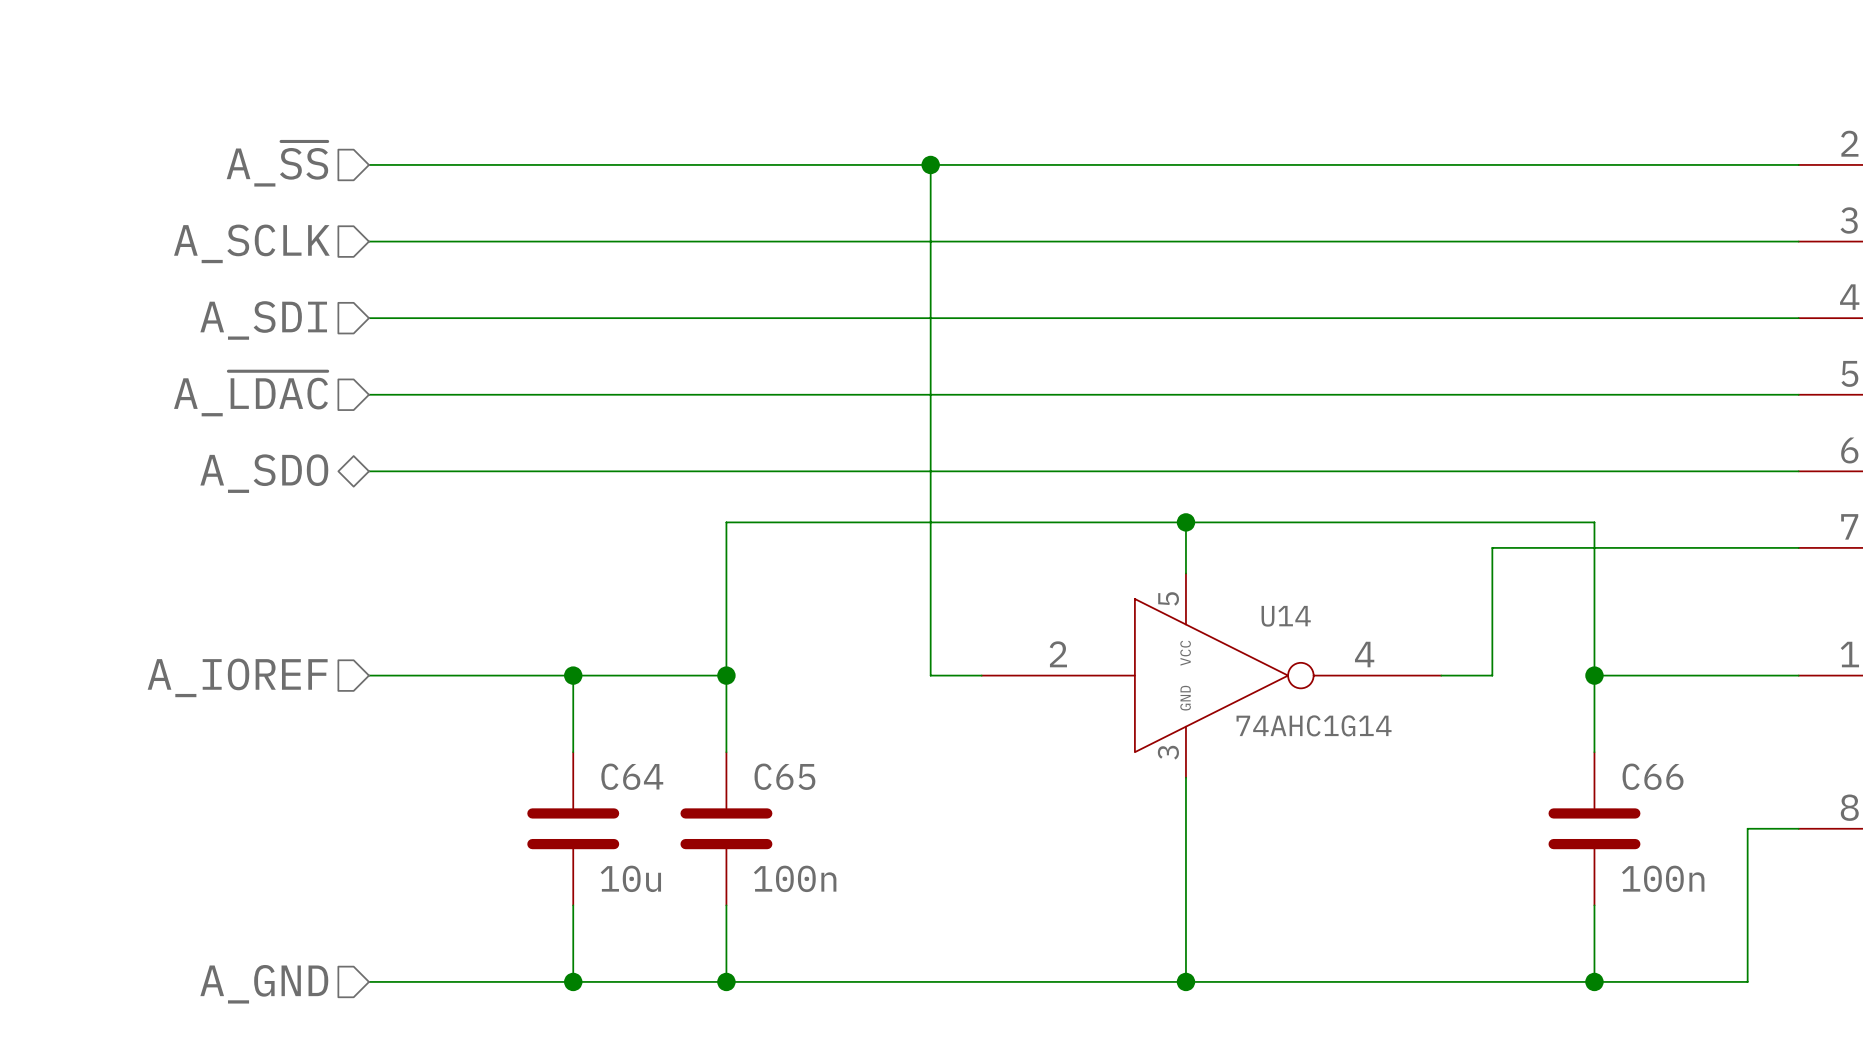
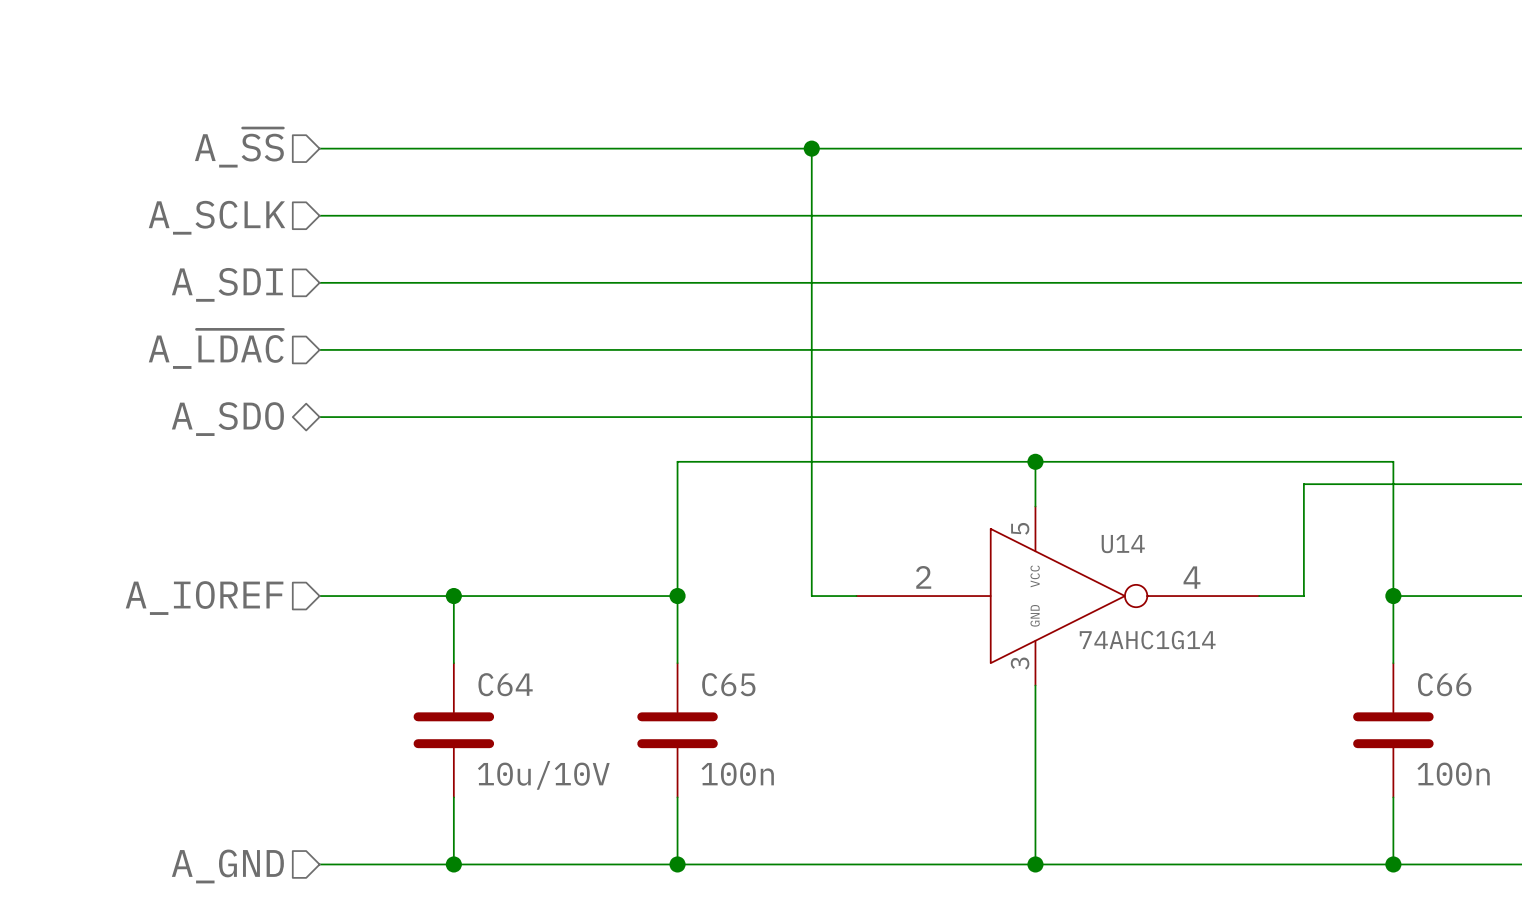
wire: (777, 522) (726, 522) (726, 752) -> (677, 461) (677, 663)
wire: (573, 675) (573, 752) -> (453, 596) (453, 663)
junction position: (573, 675) -> (453, 596)
wire: none -> (632, 596) (677, 596)
junction position: (726, 675) -> (677, 596)
C64 position: (573, 828) -> (453, 730)
C65 position: (726, 828) -> (677, 730)
C64 value: 10u (630, 878) -> 10u/10V (543, 775)
wire: (573, 905) (573, 981) -> (453, 797) (453, 864)
wire: (726, 905) (726, 981) -> (677, 797) (677, 864)
junction position: (573, 981) -> (453, 864)
junction position: (726, 981) -> (677, 864)

